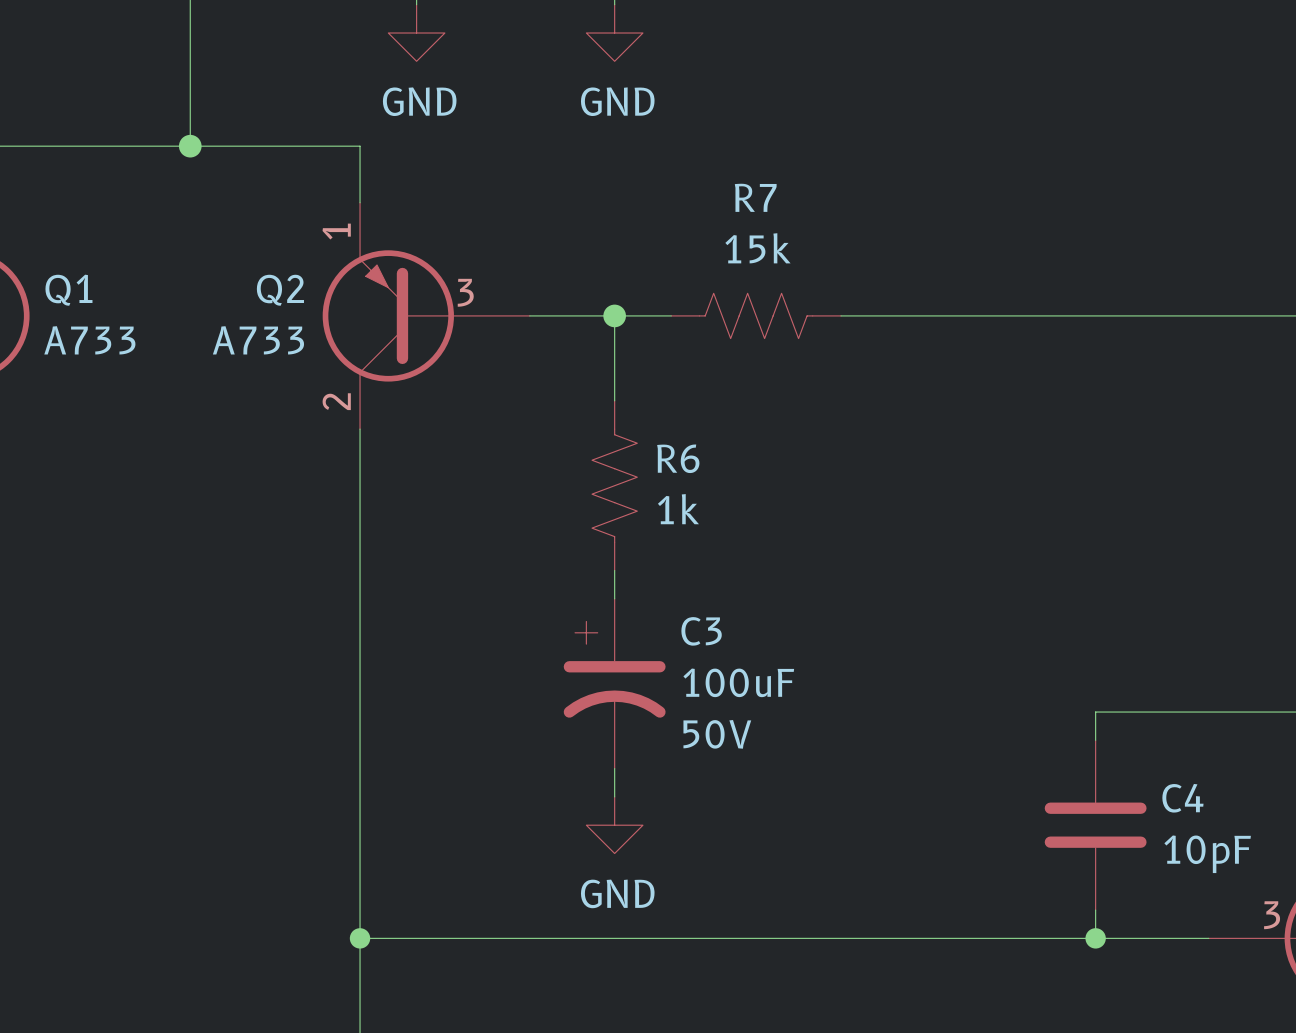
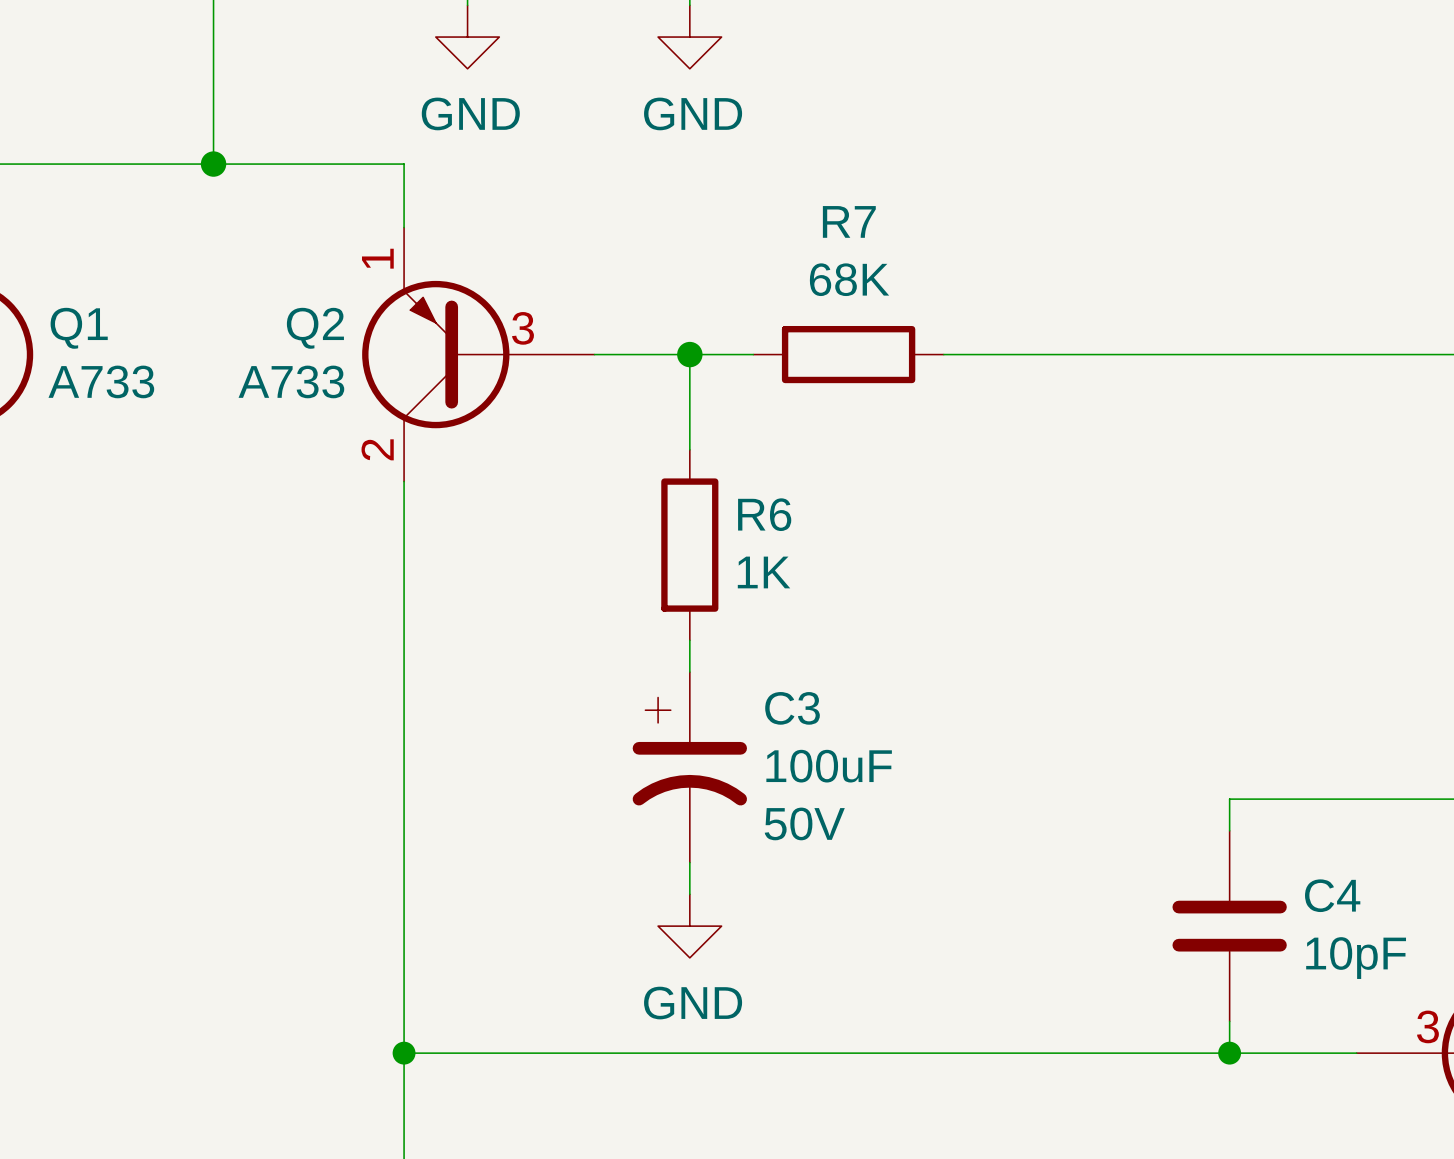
R7 value: 15k (757, 248) -> 68K (849, 279)
R7 symbol: [671, 293, 842, 339] -> [753, 325, 944, 384]
R6 symbol: [592, 400, 638, 571] -> [661, 449, 719, 641]
R6 value: 1k (678, 509) -> 1K (764, 572)

